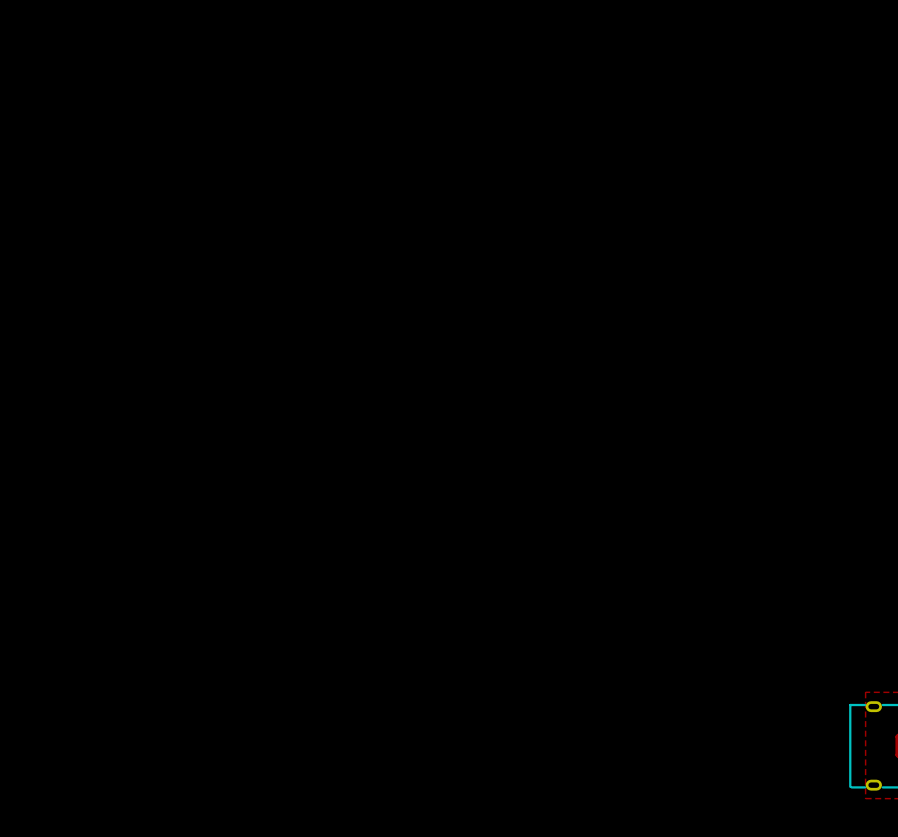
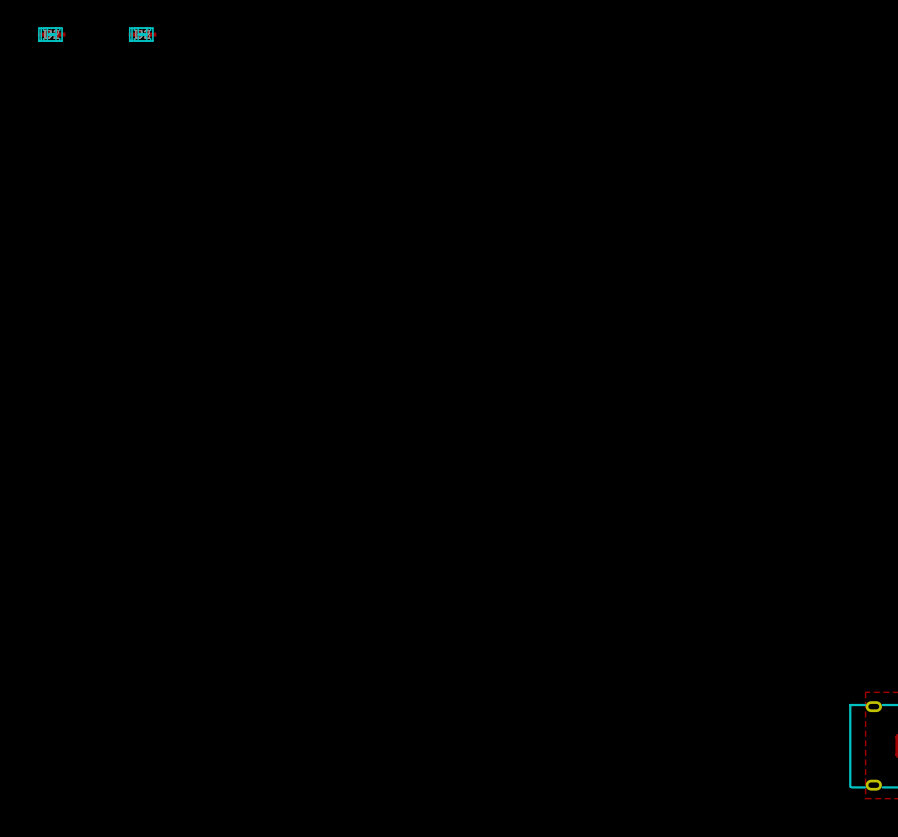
part: none -> (50, 34)
part: none -> (51, 34)
part: none -> (141, 34)
part: none -> (142, 34)

